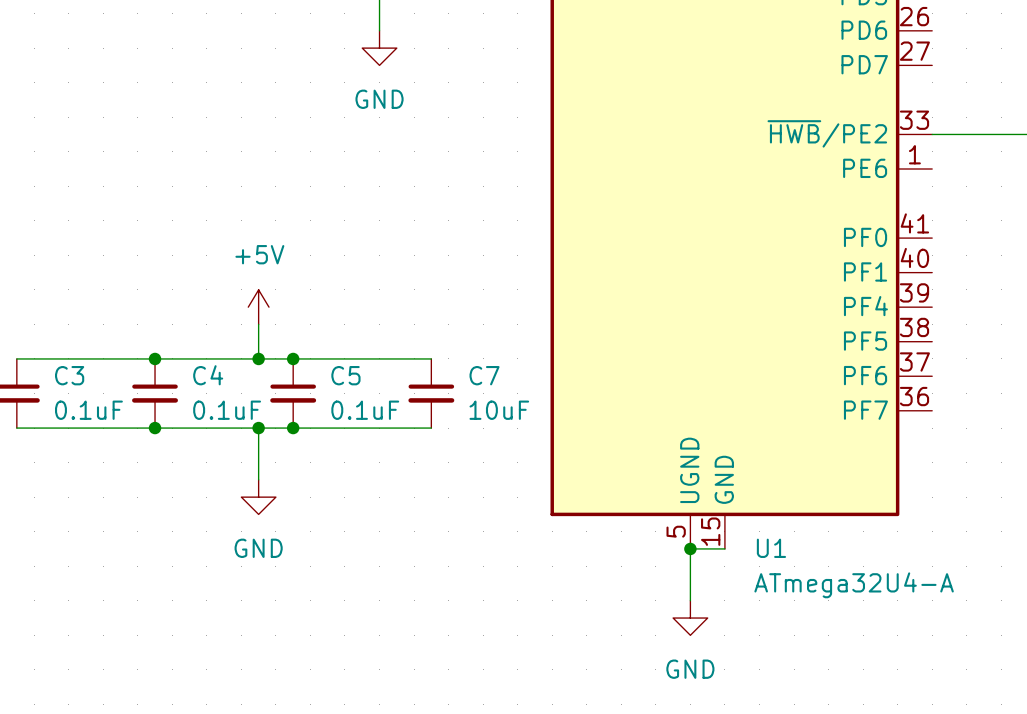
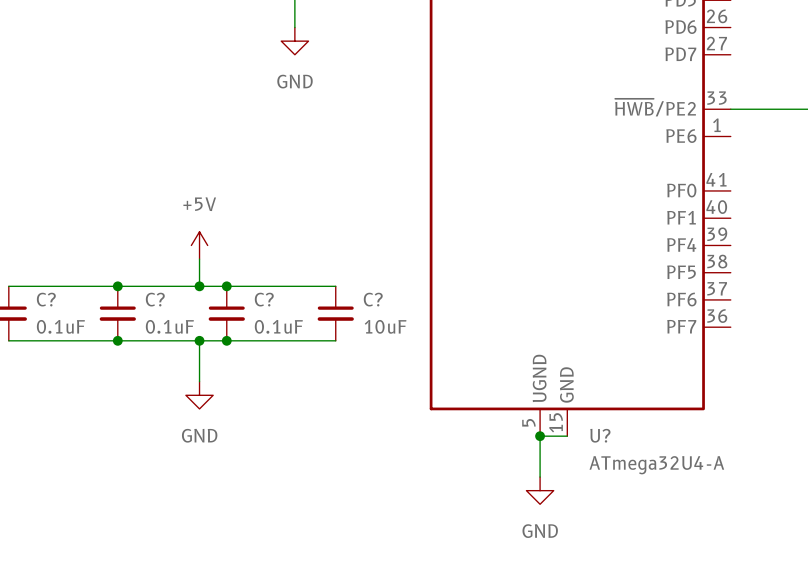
C3 name: C3 (69, 375) -> C? (46, 299)
C4 name: C4 (208, 375) -> C? (155, 299)
C5 name: C5 (345, 375) -> C? (264, 299)
C7 name: C7 (484, 375) -> C? (373, 299)
U1 name: U1 (771, 548) -> U? (600, 435)

